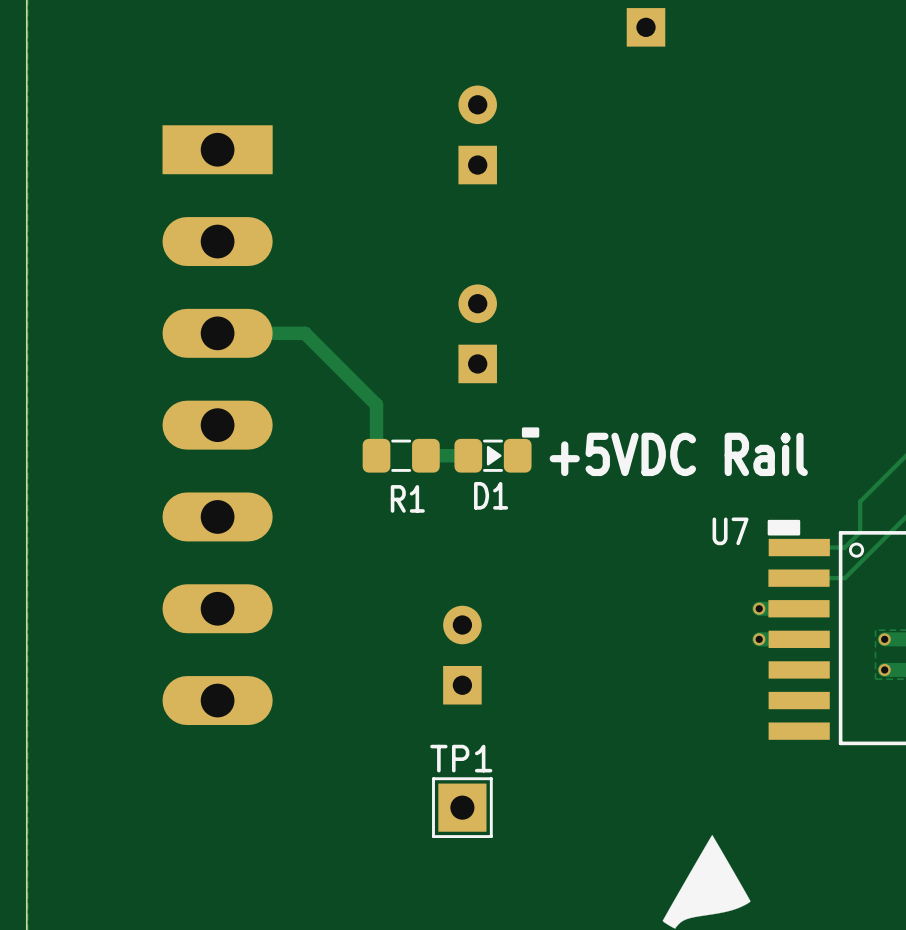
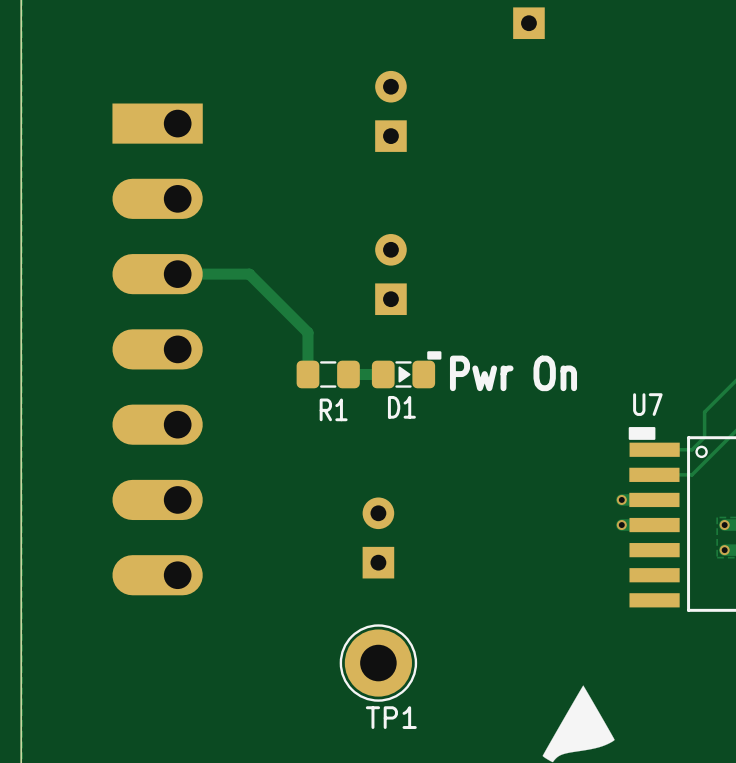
part: none -> (157, 349)
part: (217, 425) -> none
text: +5VDC Rail (678, 454) -> Pwr On (513, 373)
U7 name position: U7 (730, 531) -> U7 (647, 404)
TP1 name position: TP1 (461, 758) -> TP1 (391, 717)
TP1 footprint: [432, 777, 493, 839] -> [339, 624, 418, 702]

